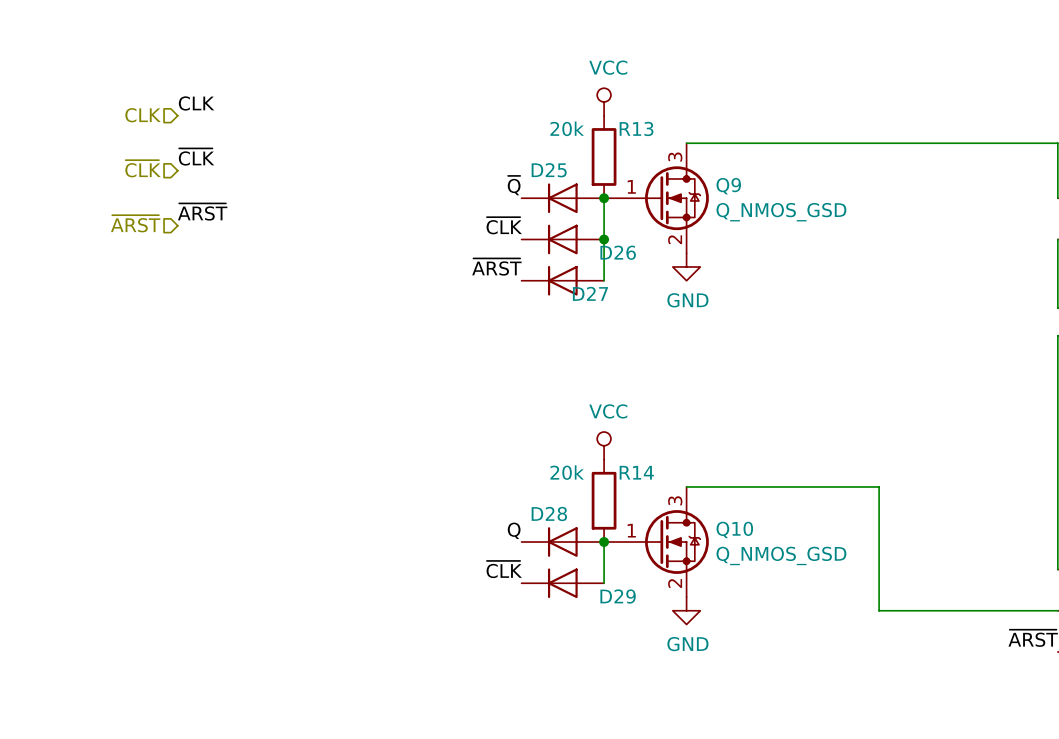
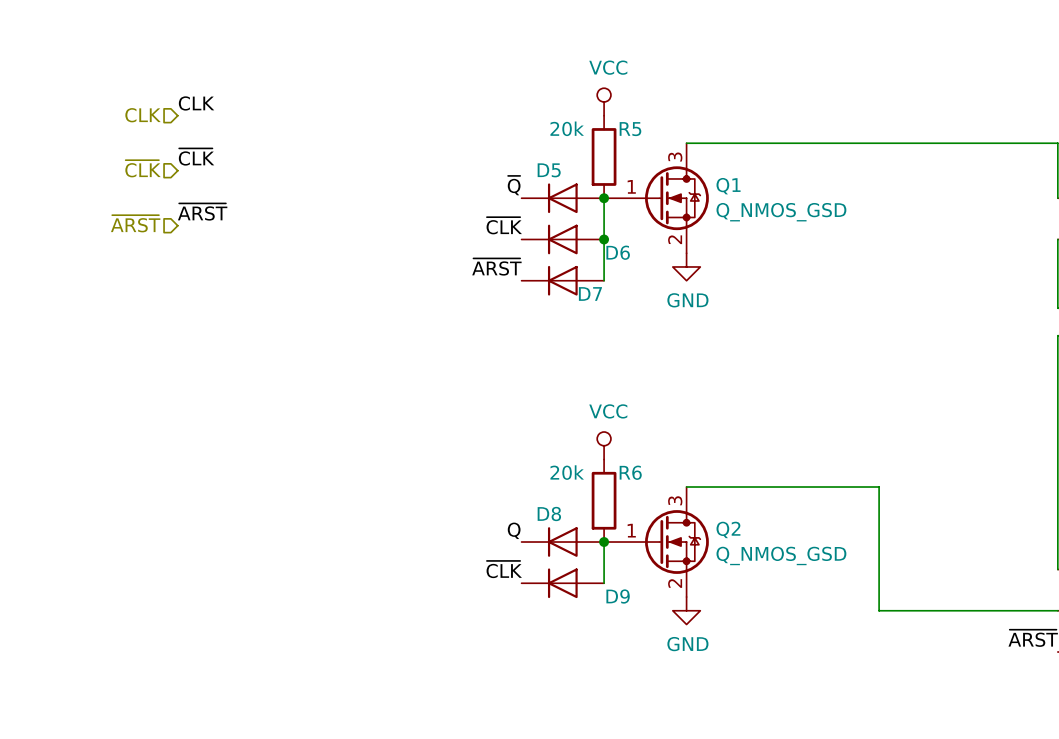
R13 name: R13 (636, 128) -> R5 (630, 129)
D25 name: D25 (549, 170) -> D5 (549, 170)
Q9 name: Q9 (728, 186) -> Q1 (728, 186)
D26 name: D26 (618, 252) -> D6 (618, 252)
D27 name: D27 (590, 293) -> D7 (590, 293)
R14 name: R14 (636, 472) -> R6 (630, 472)
D28 name: D28 (549, 514) -> D8 (549, 514)
Q10 name: Q10 (734, 529) -> Q2 (728, 529)
D29 name: D29 (618, 596) -> D9 (618, 596)

